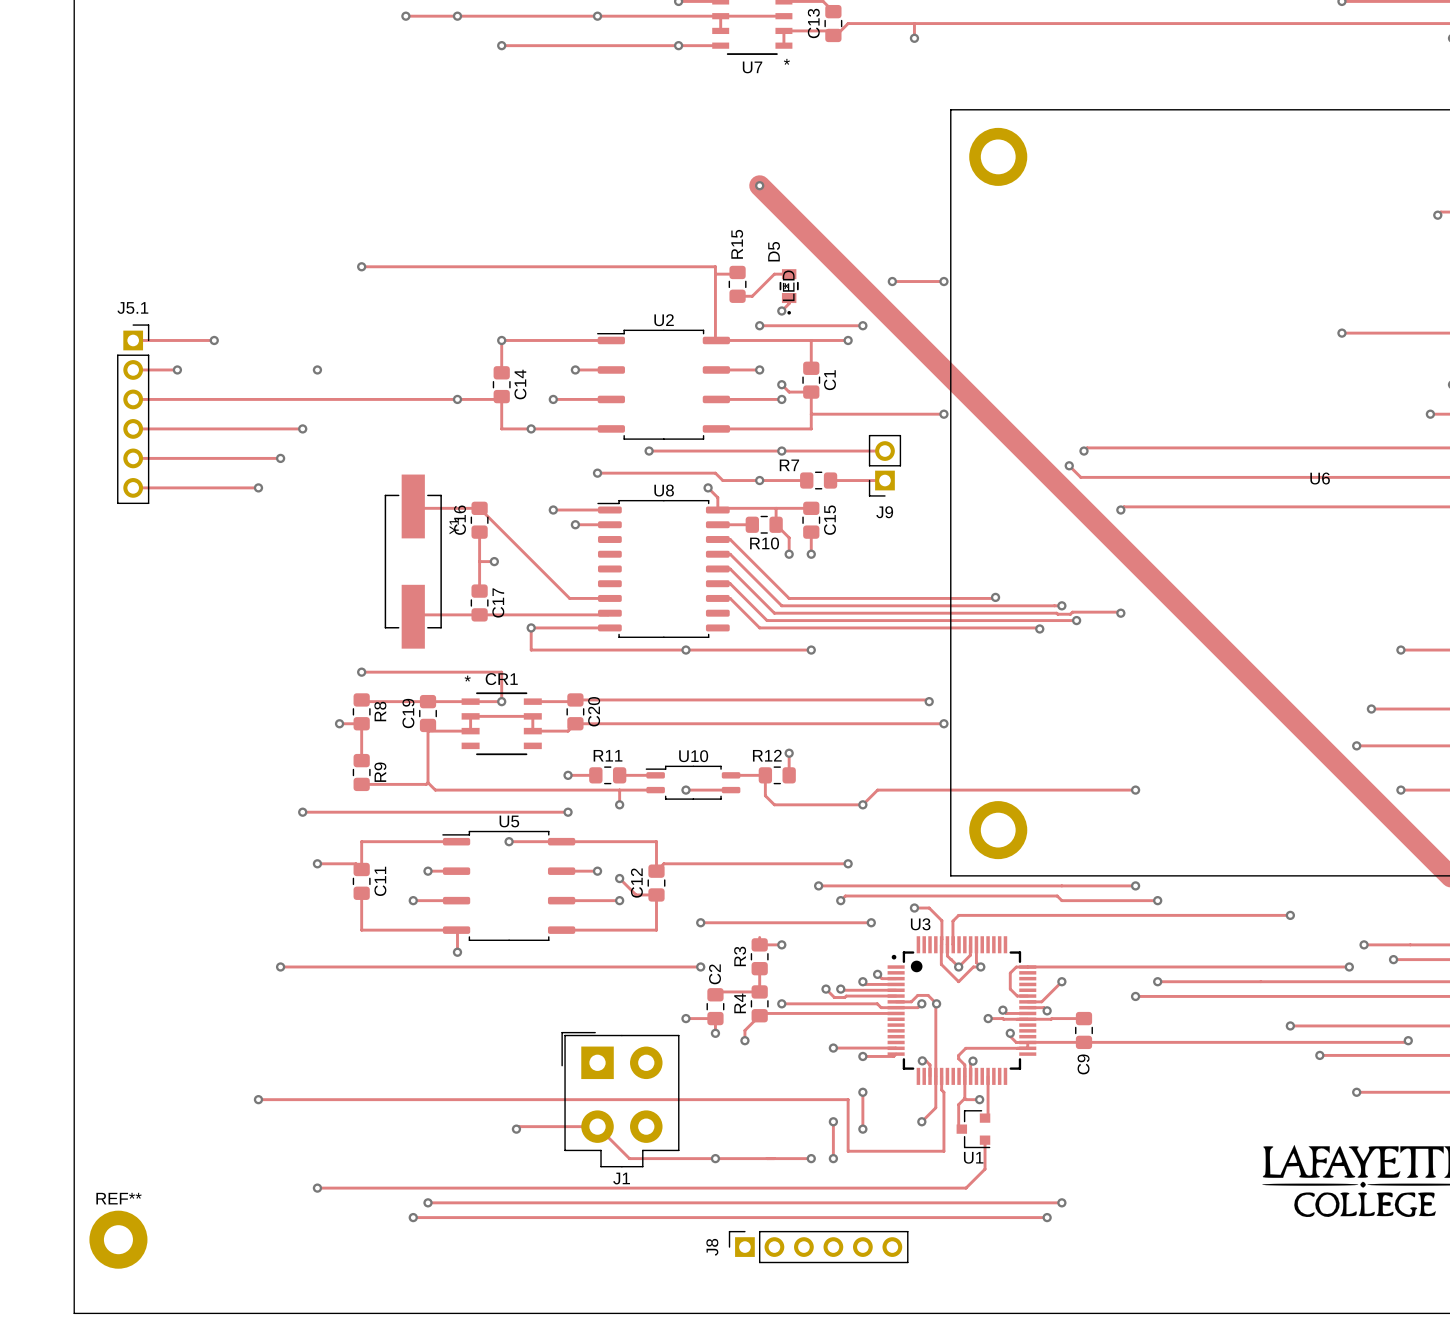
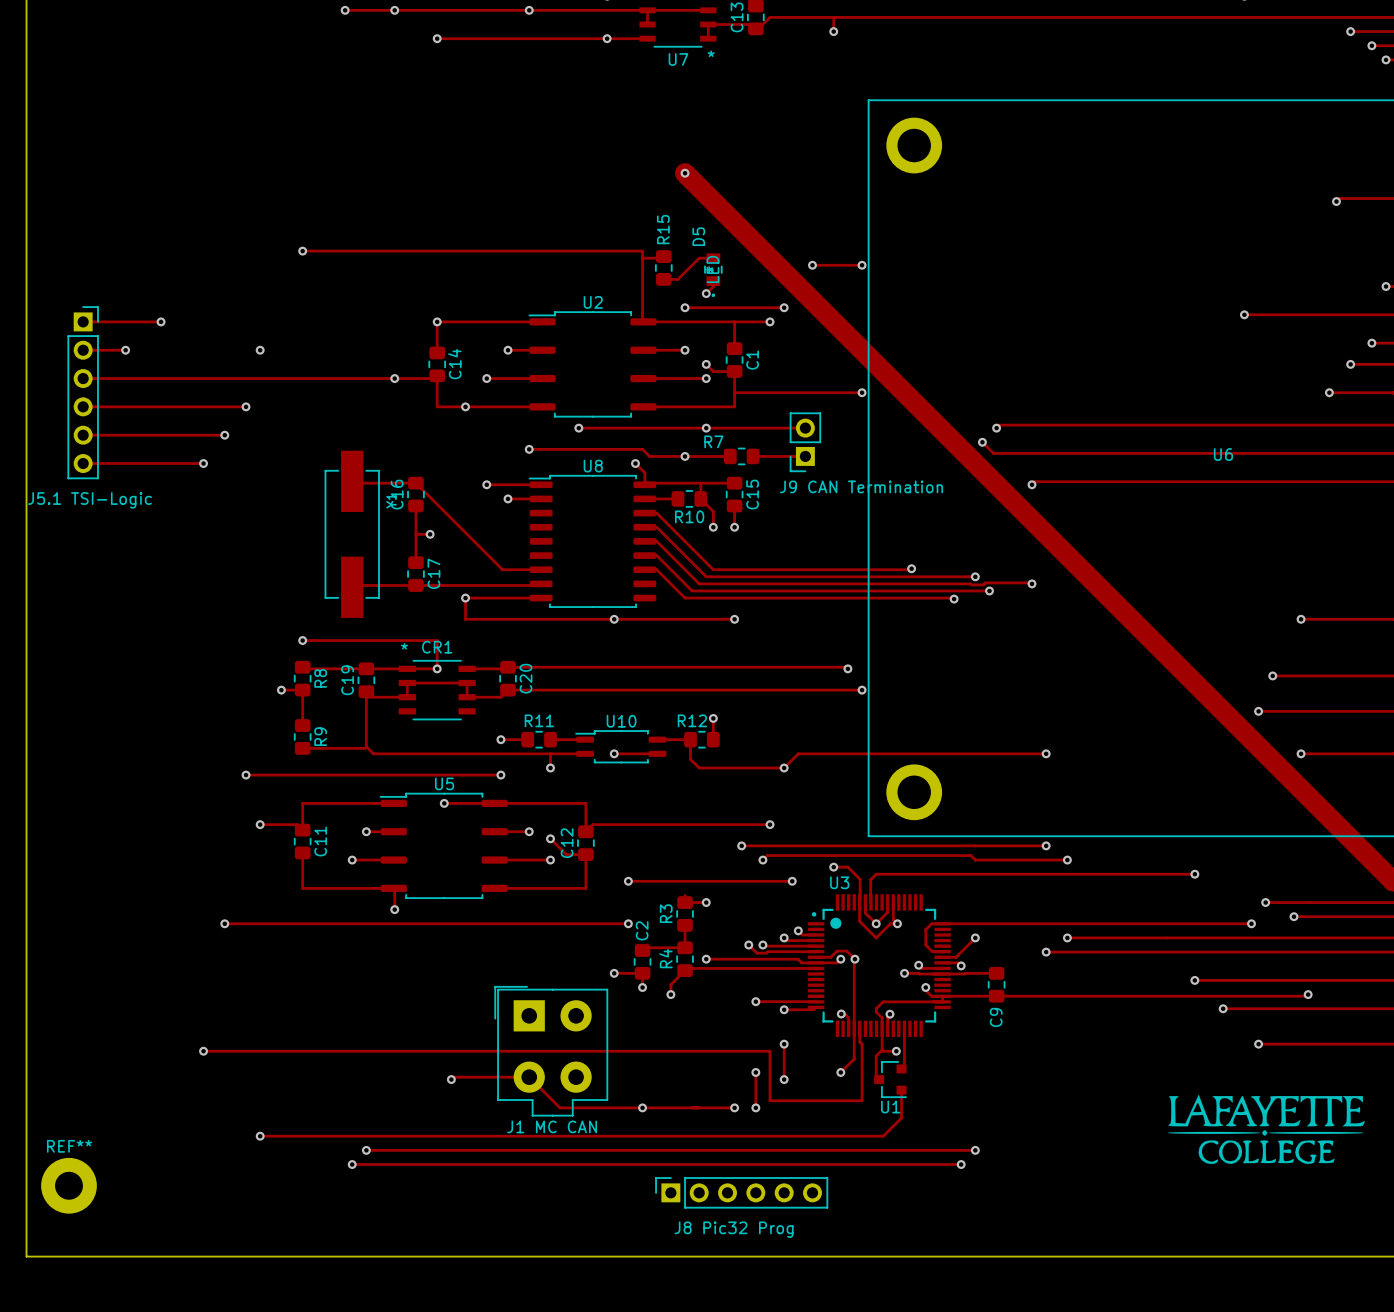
J5.1 name: J5.1 (132, 307) -> J5.1 TSI-Logic (89, 500)
J9 name: J9 (884, 512) -> J9 CAN Termination (861, 486)
J1 name: J1 (621, 1178) -> J1 MC CAN (552, 1126)
J8 name: J8 (712, 1247) -> J8 Pic32 Prog (734, 1229)

